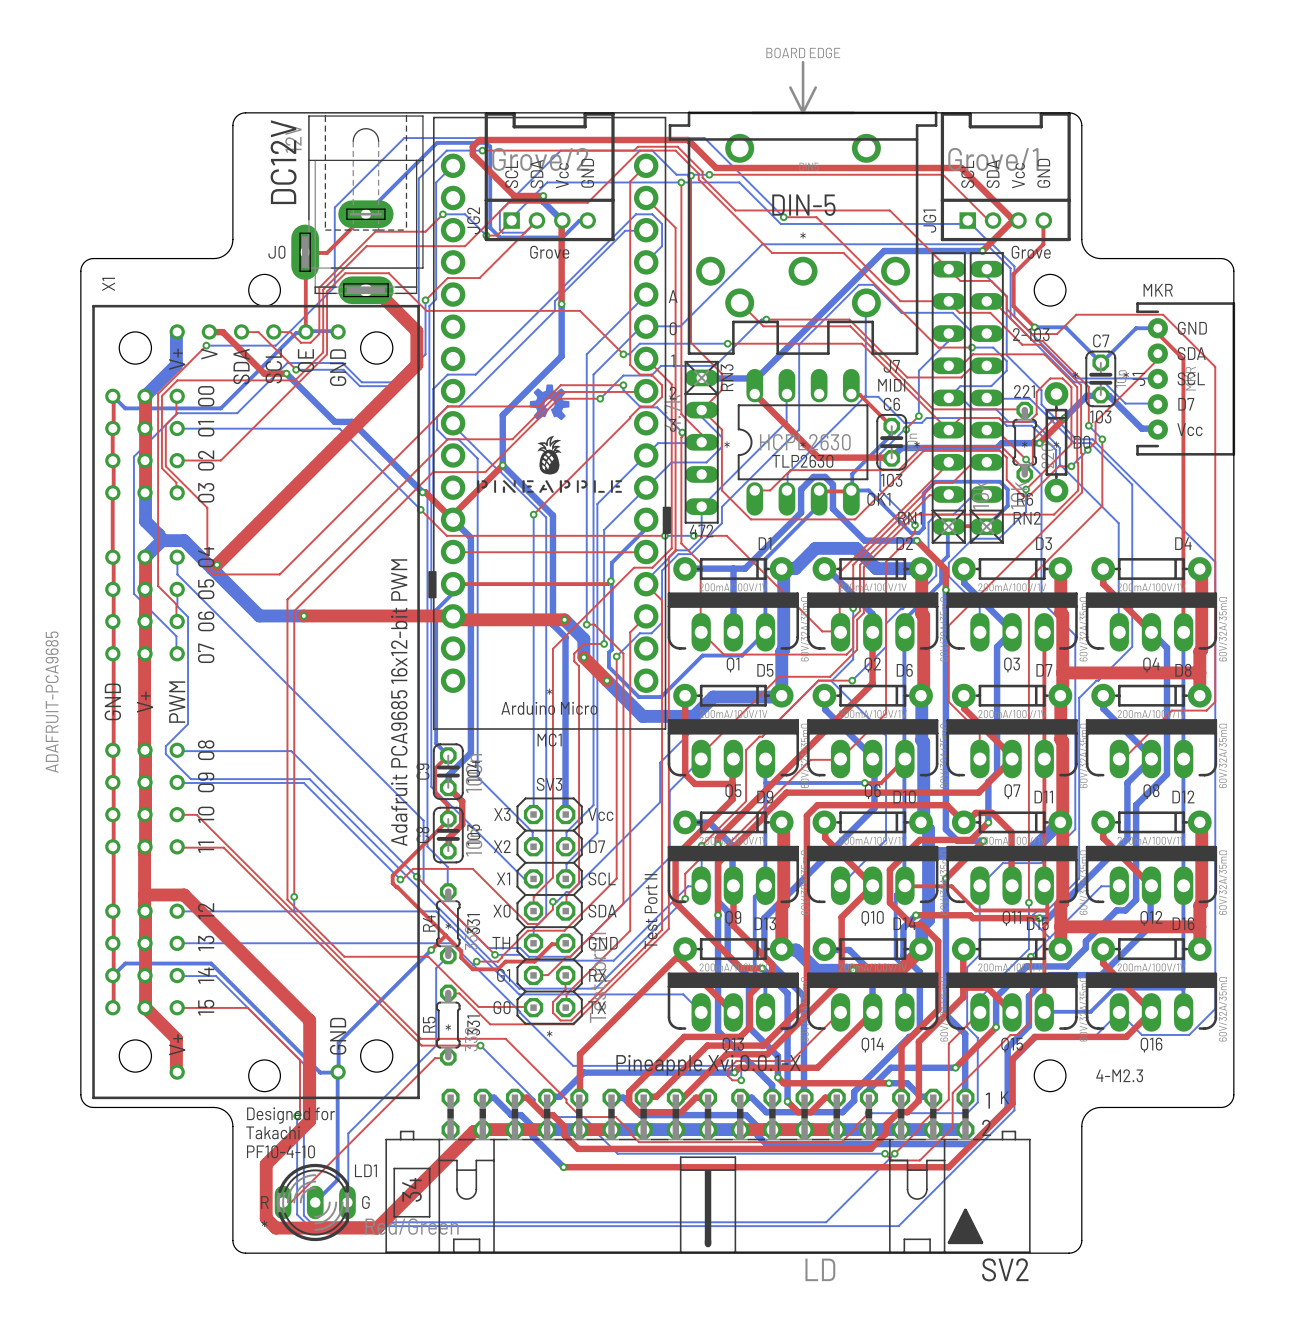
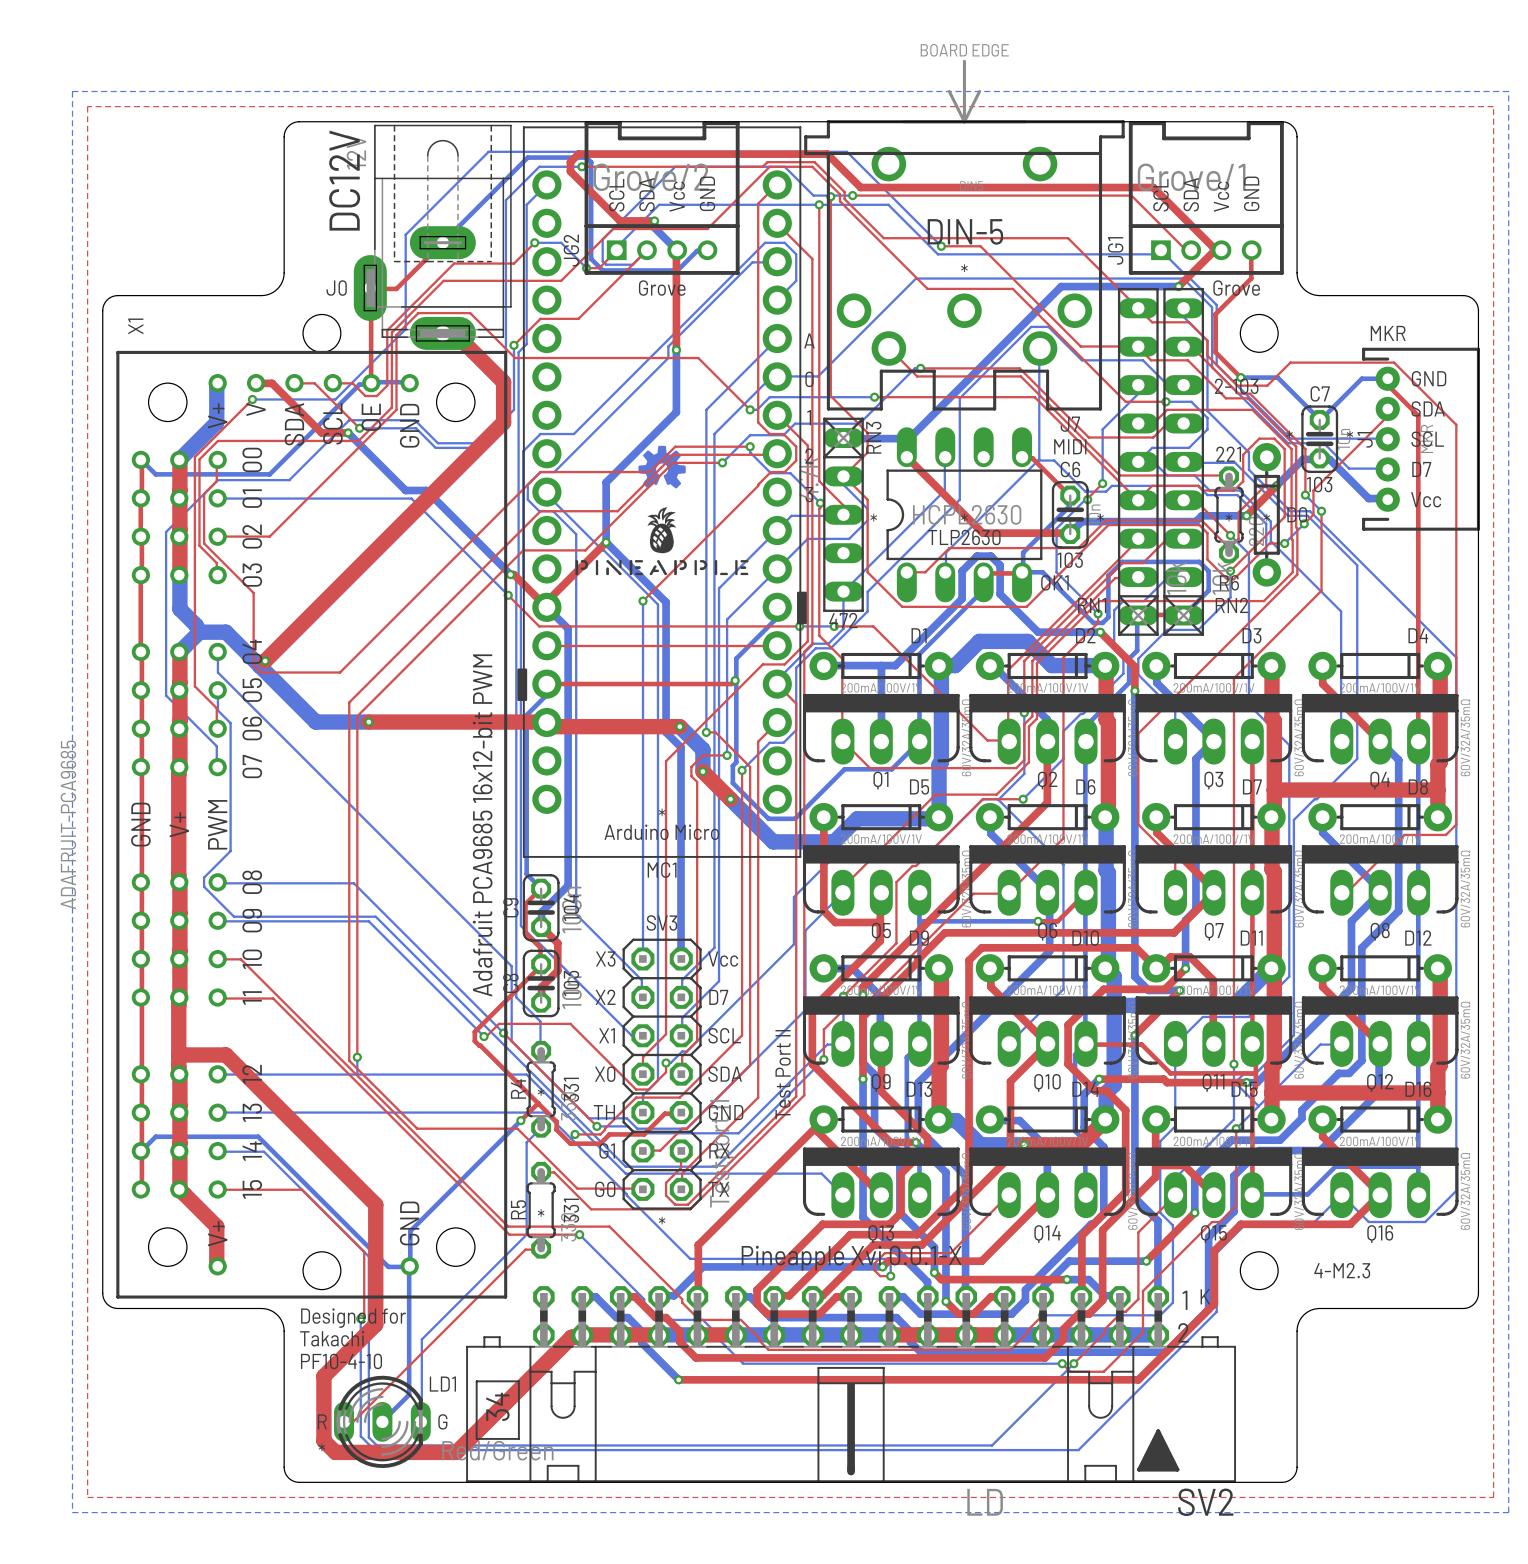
bottom zone outline: none -> (72, 91) (1508, 91) (1508, 1512) (72, 1512) (72, 91)
top zone outline: none -> (87, 106) (1493, 106) (1493, 1497) (87, 1497) (87, 106)

